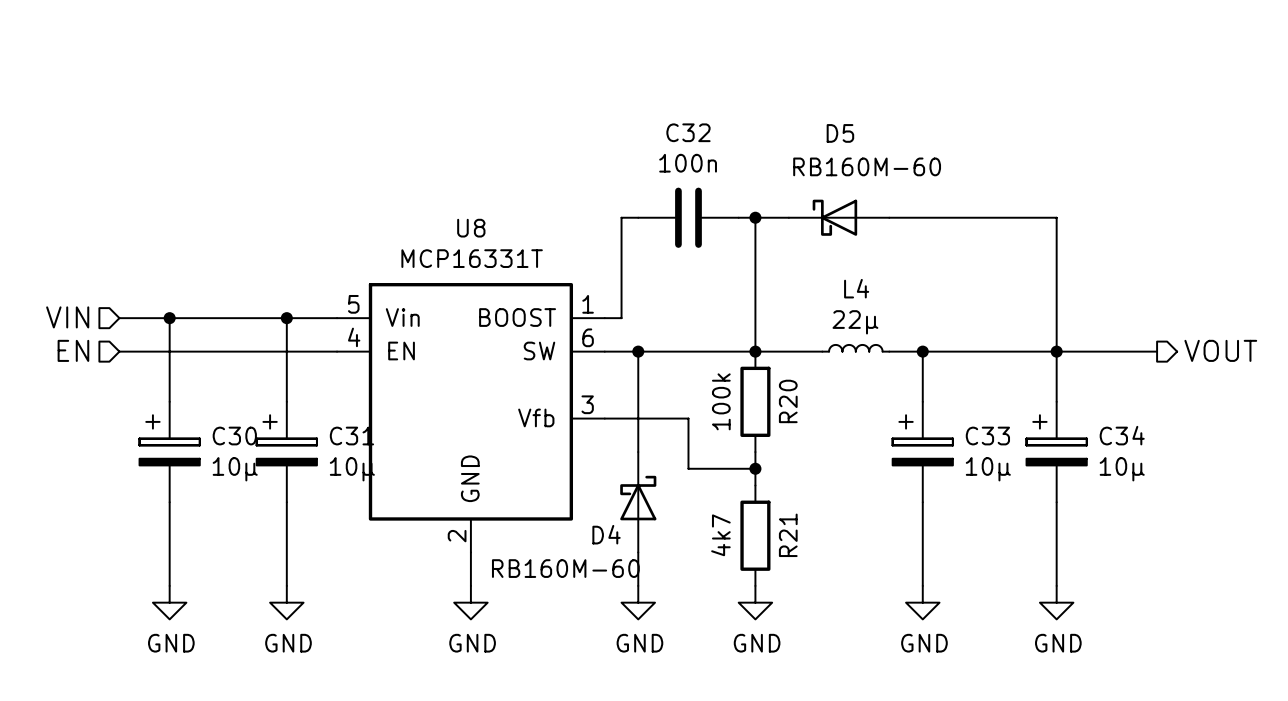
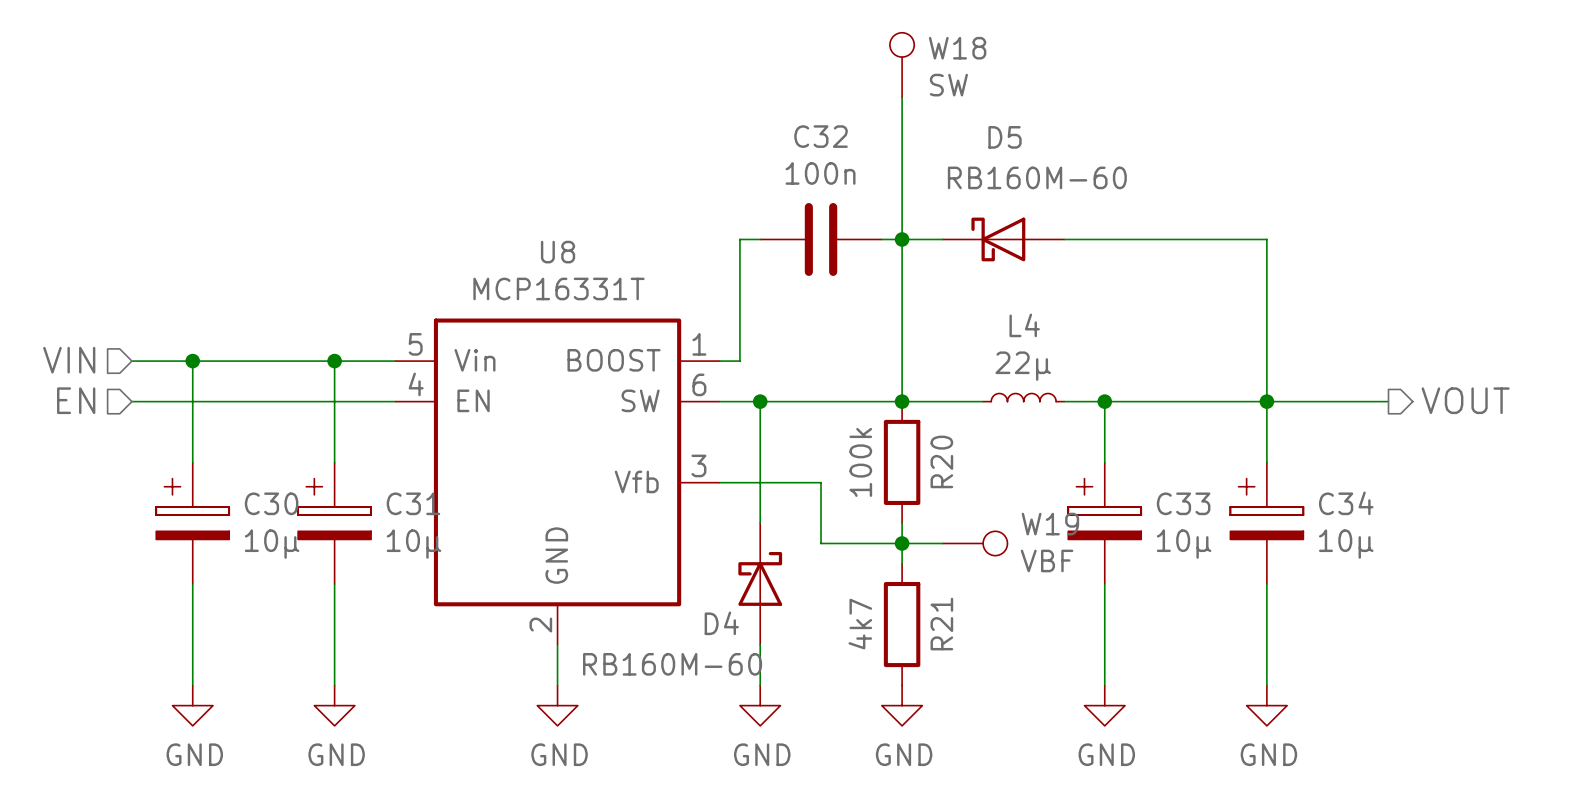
W18: none -> SW (902, 65)
wire: none -> (902, 97) (902, 239)
wire: none -> (902, 543) (942, 543)
W19: none -> VBF (975, 543)

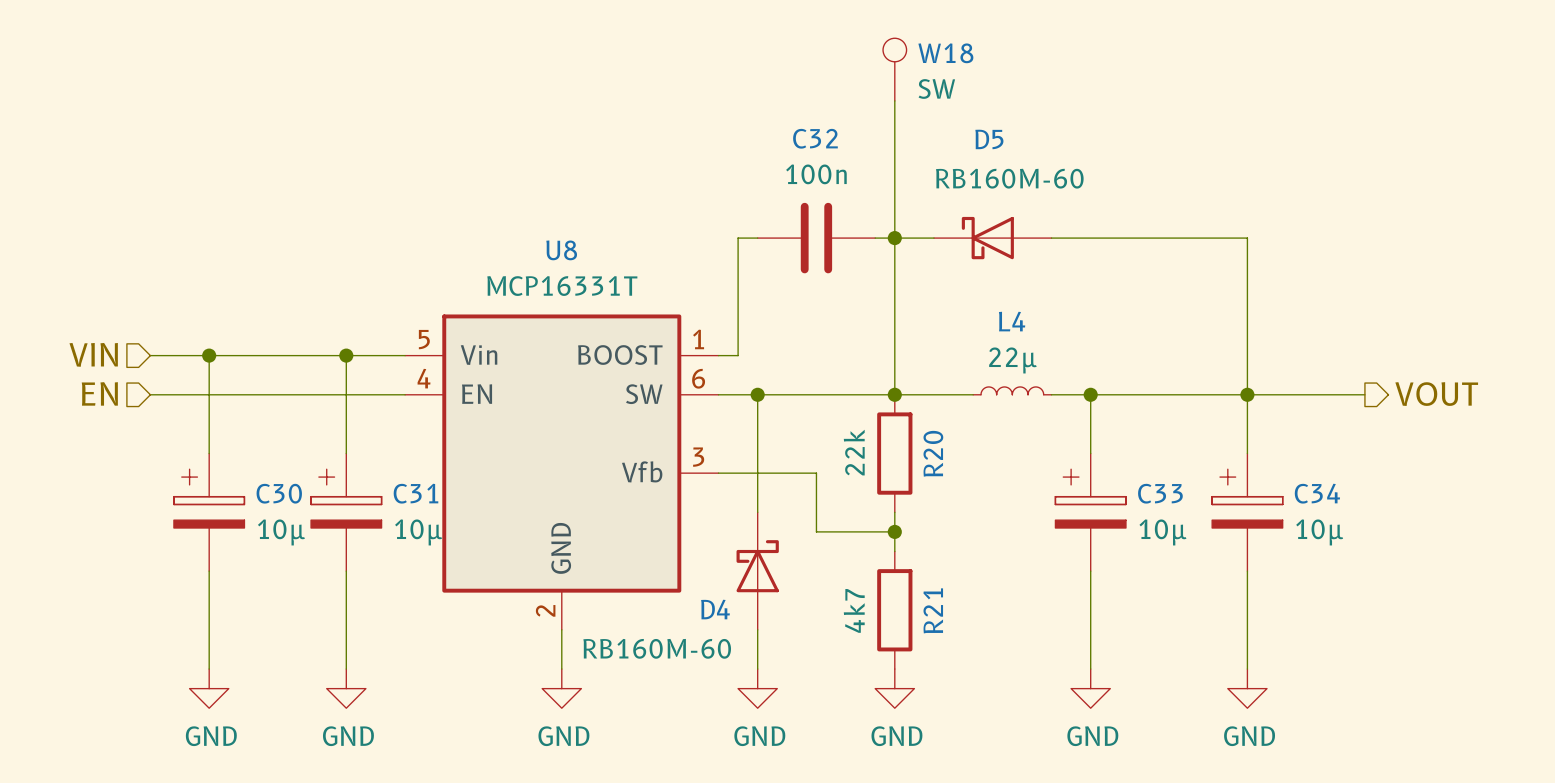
R20 value: 100k (860, 462) -> 22k (854, 452)
wire: (902, 543) (942, 543) -> none
W19: VBF (975, 543) -> none

